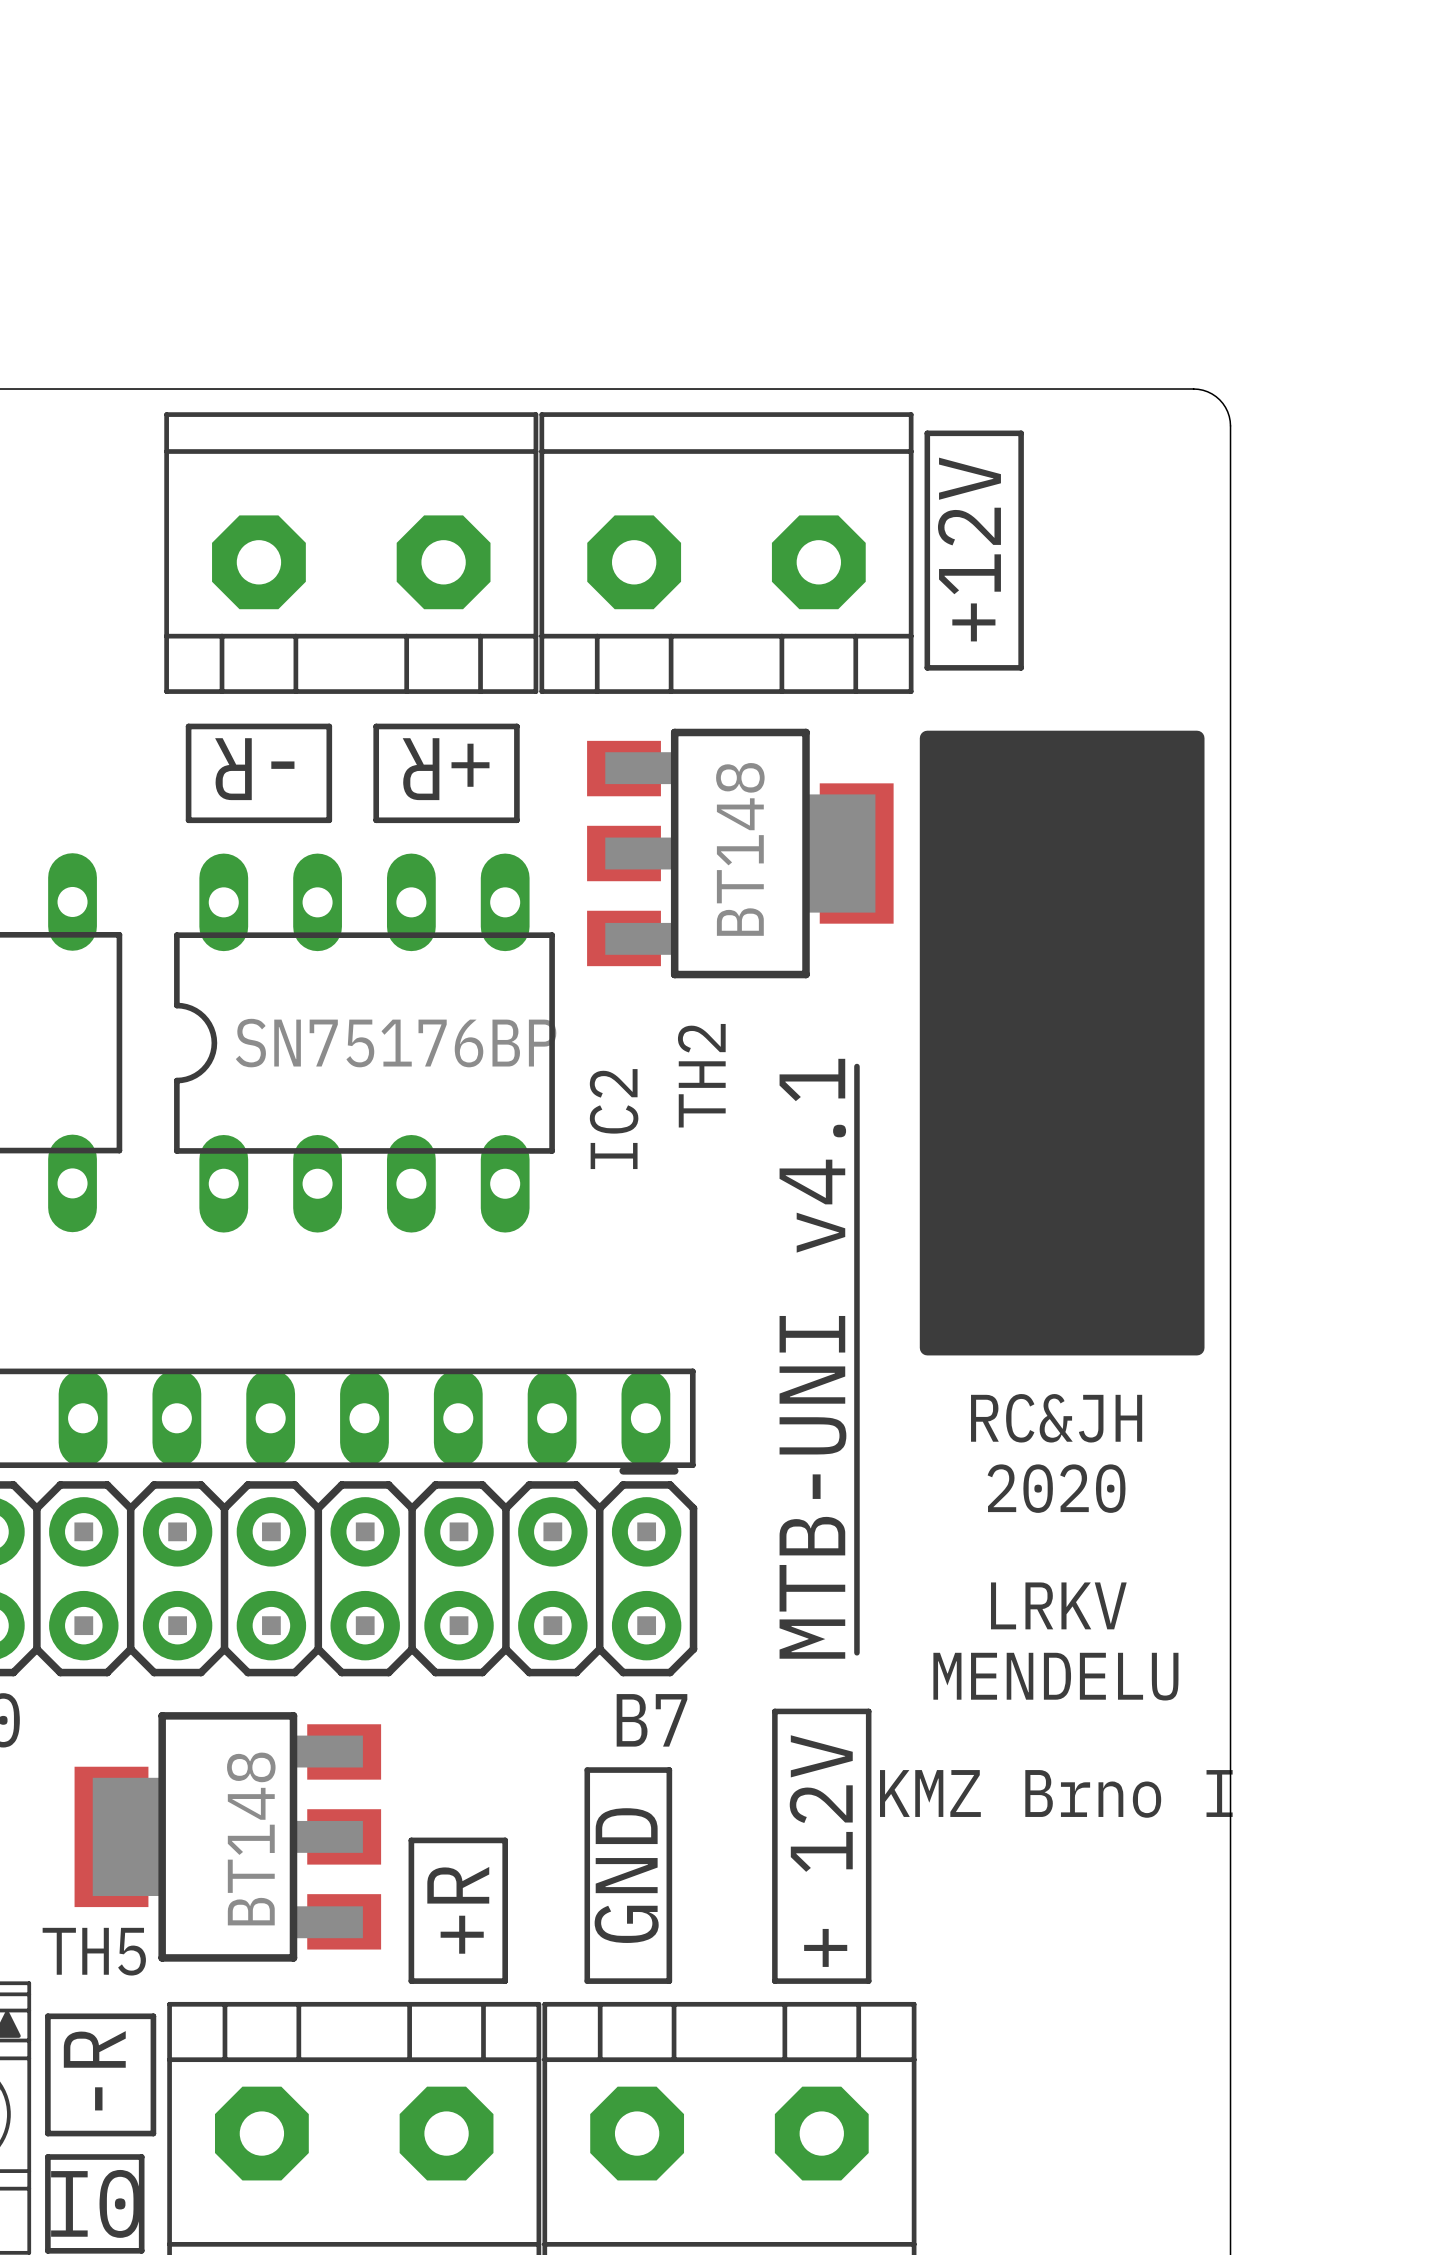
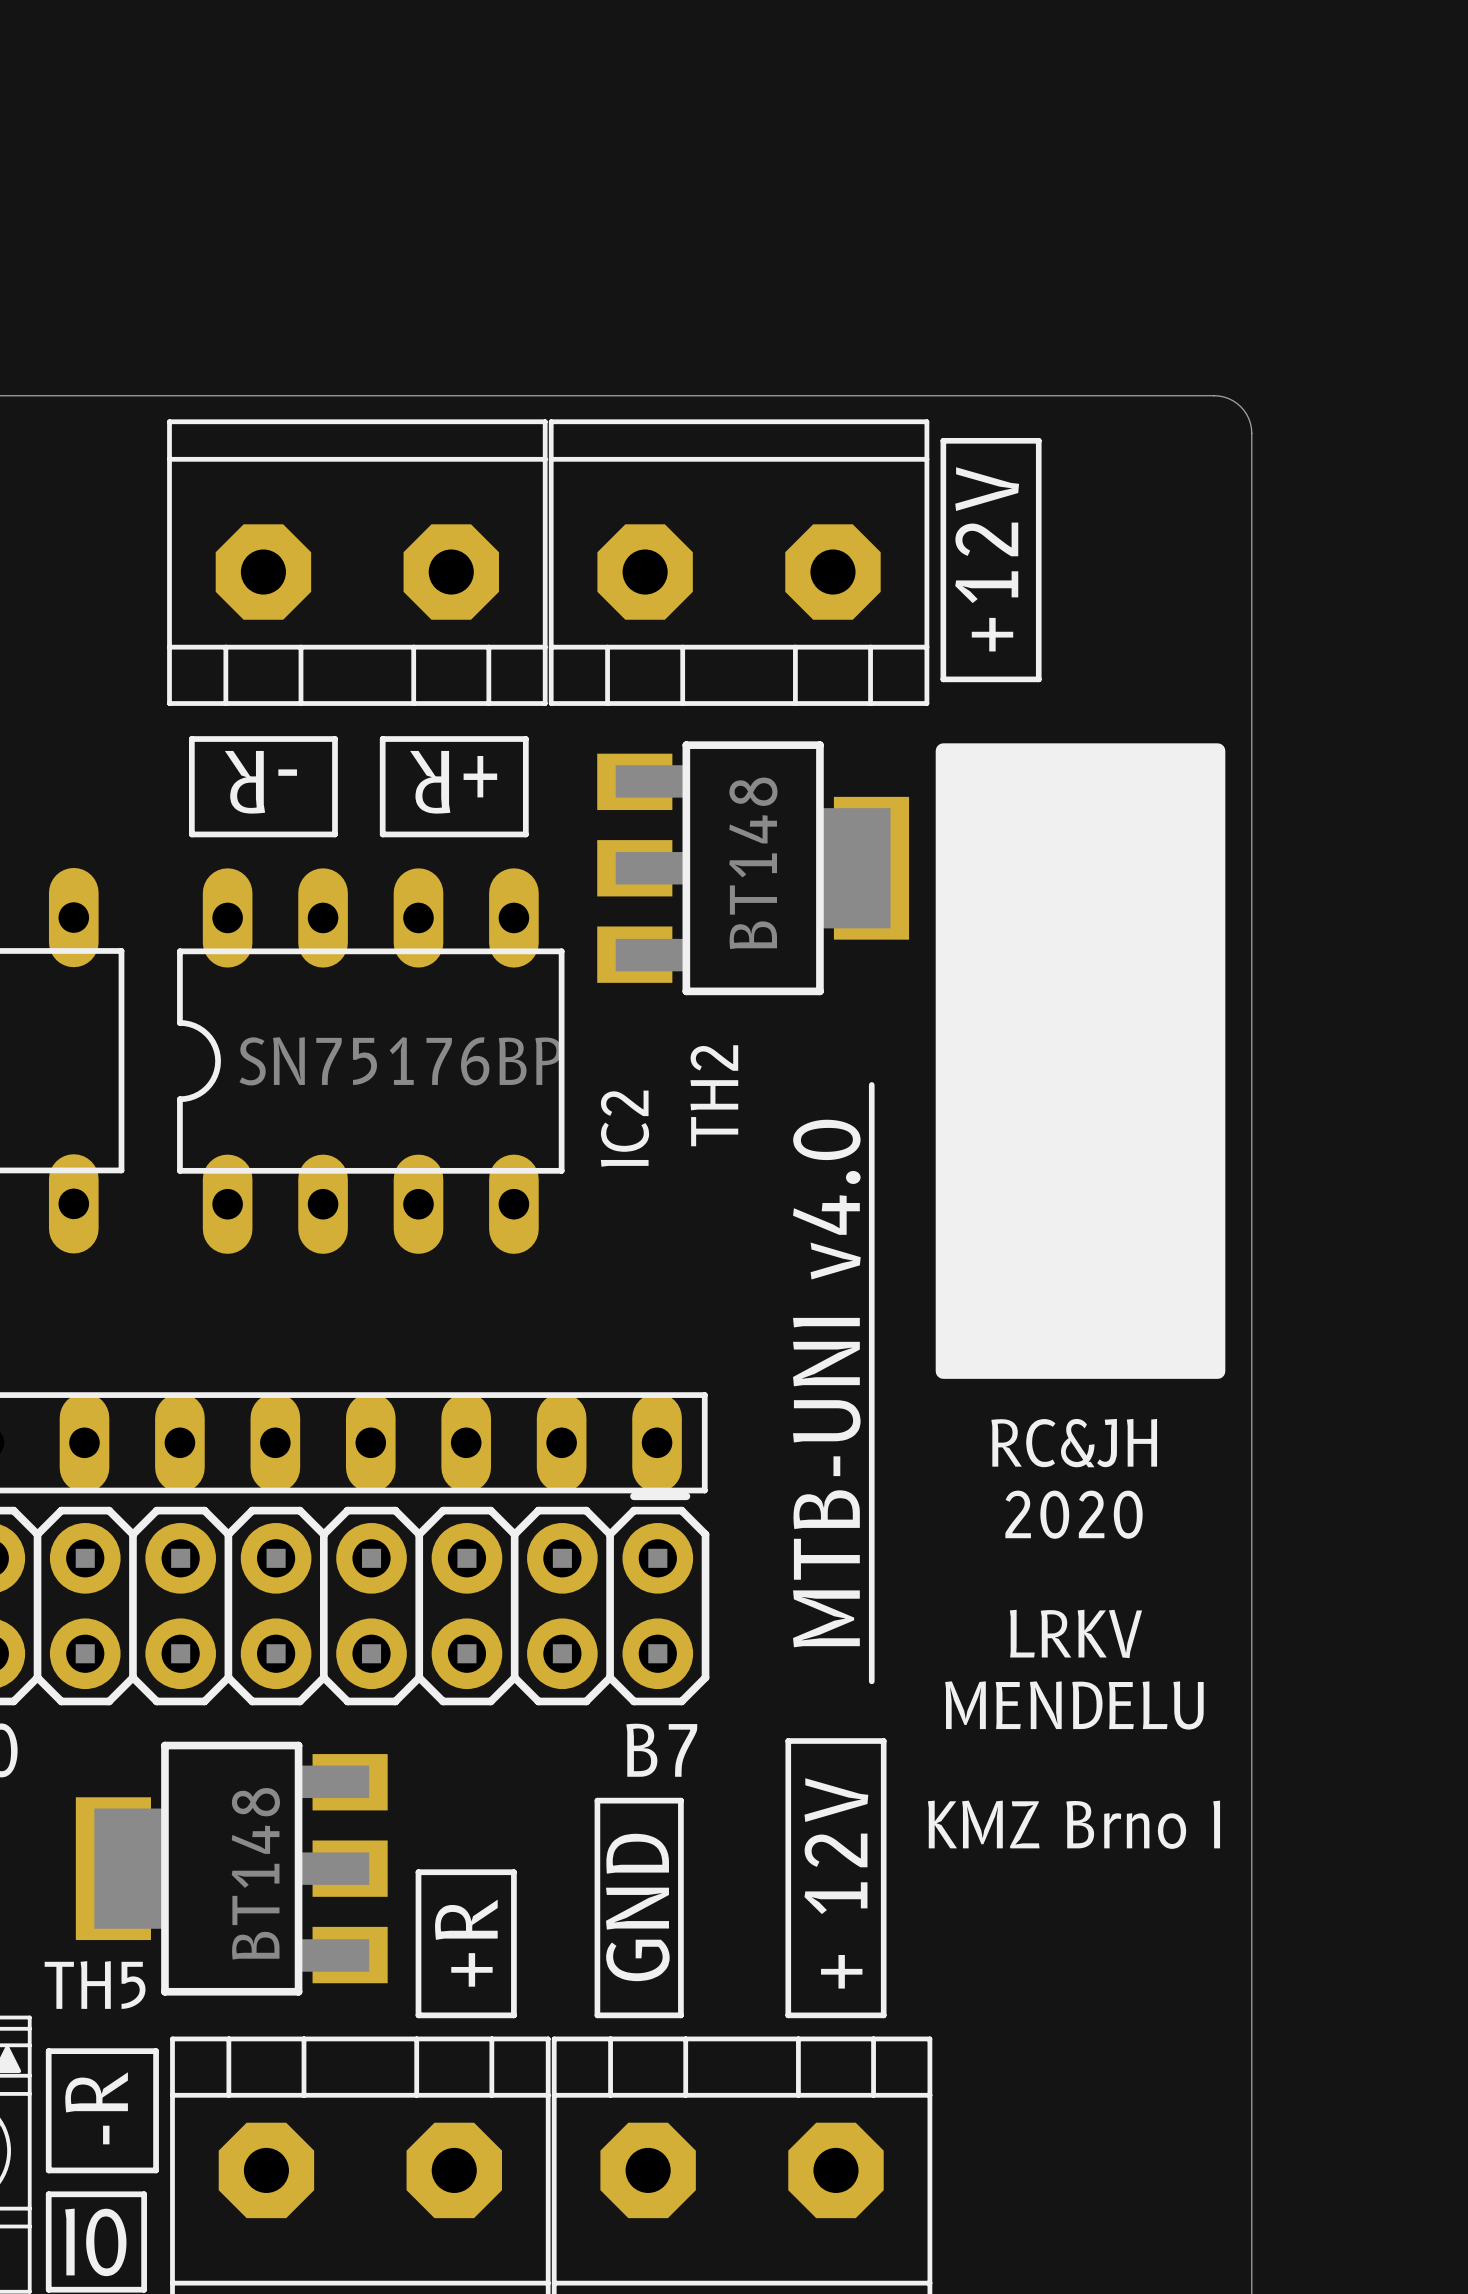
text: MTB-UNI v4.1 (812, 1358) -> MTB-UNI v4.0 (826, 1383)

